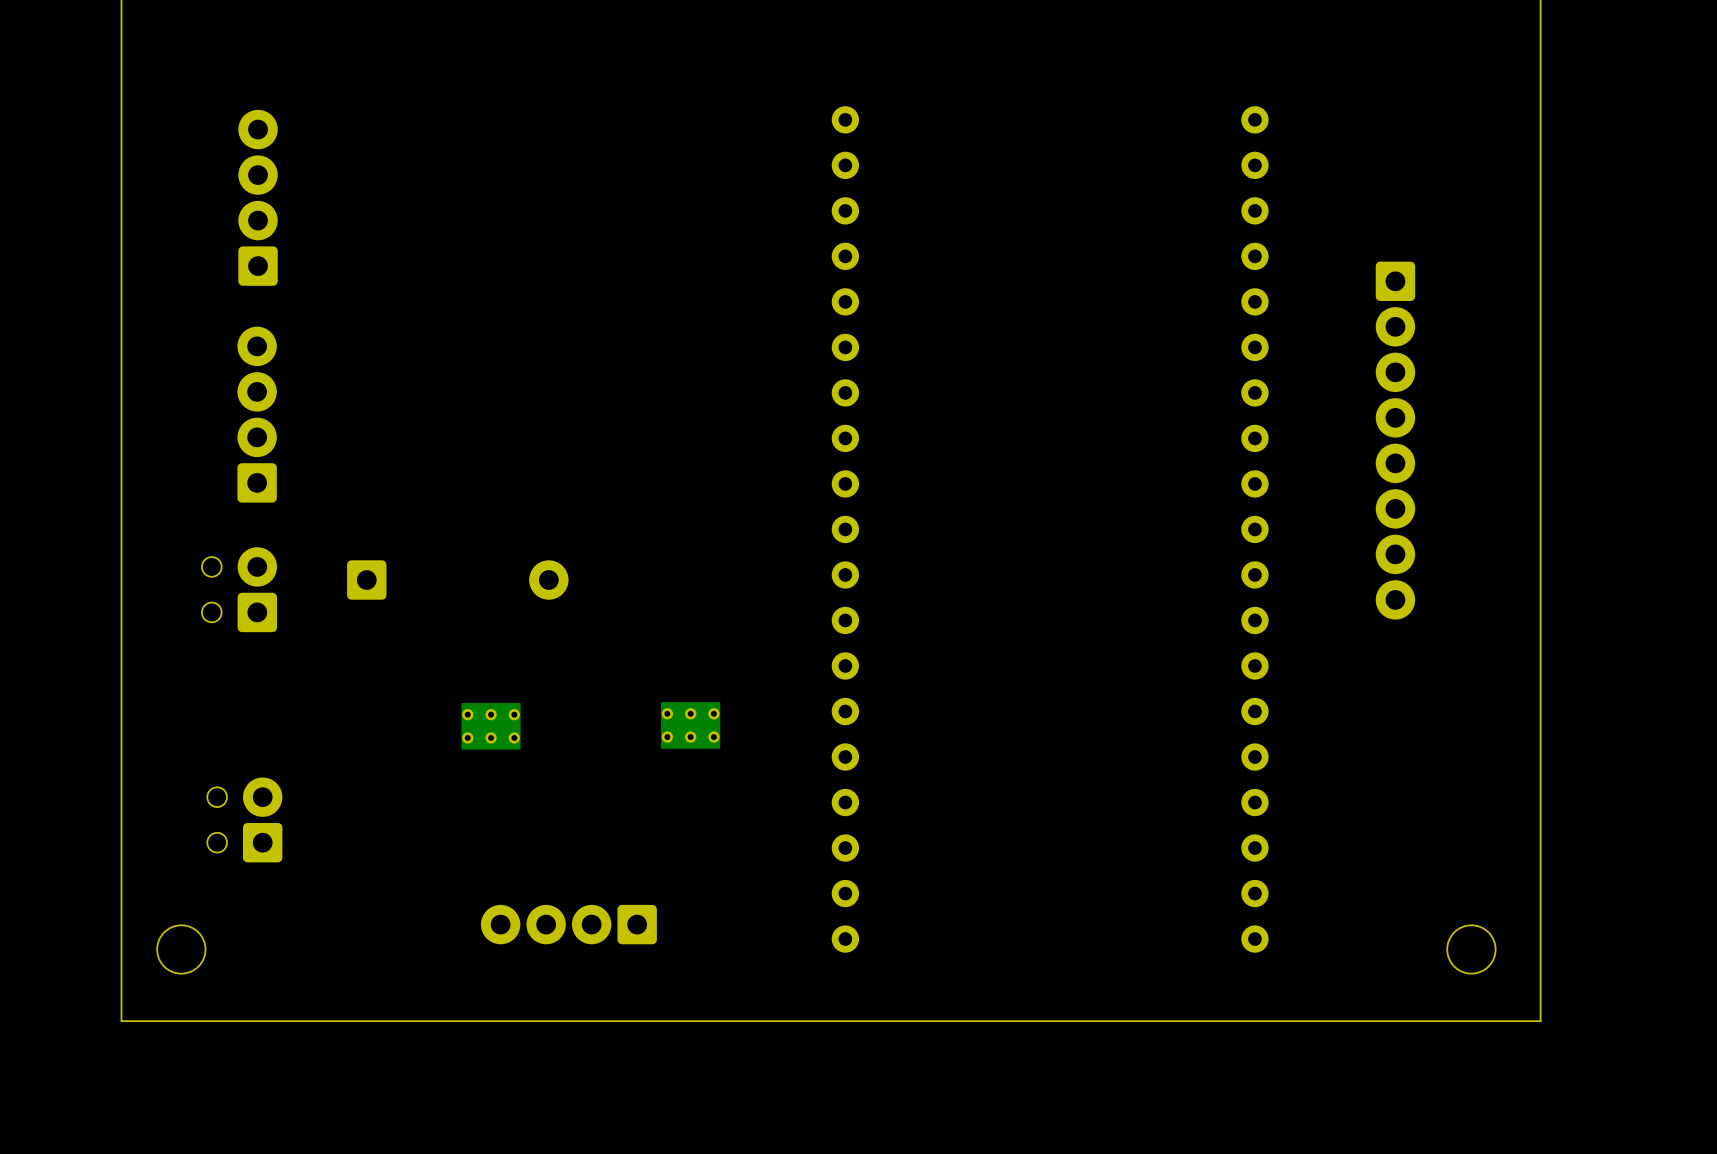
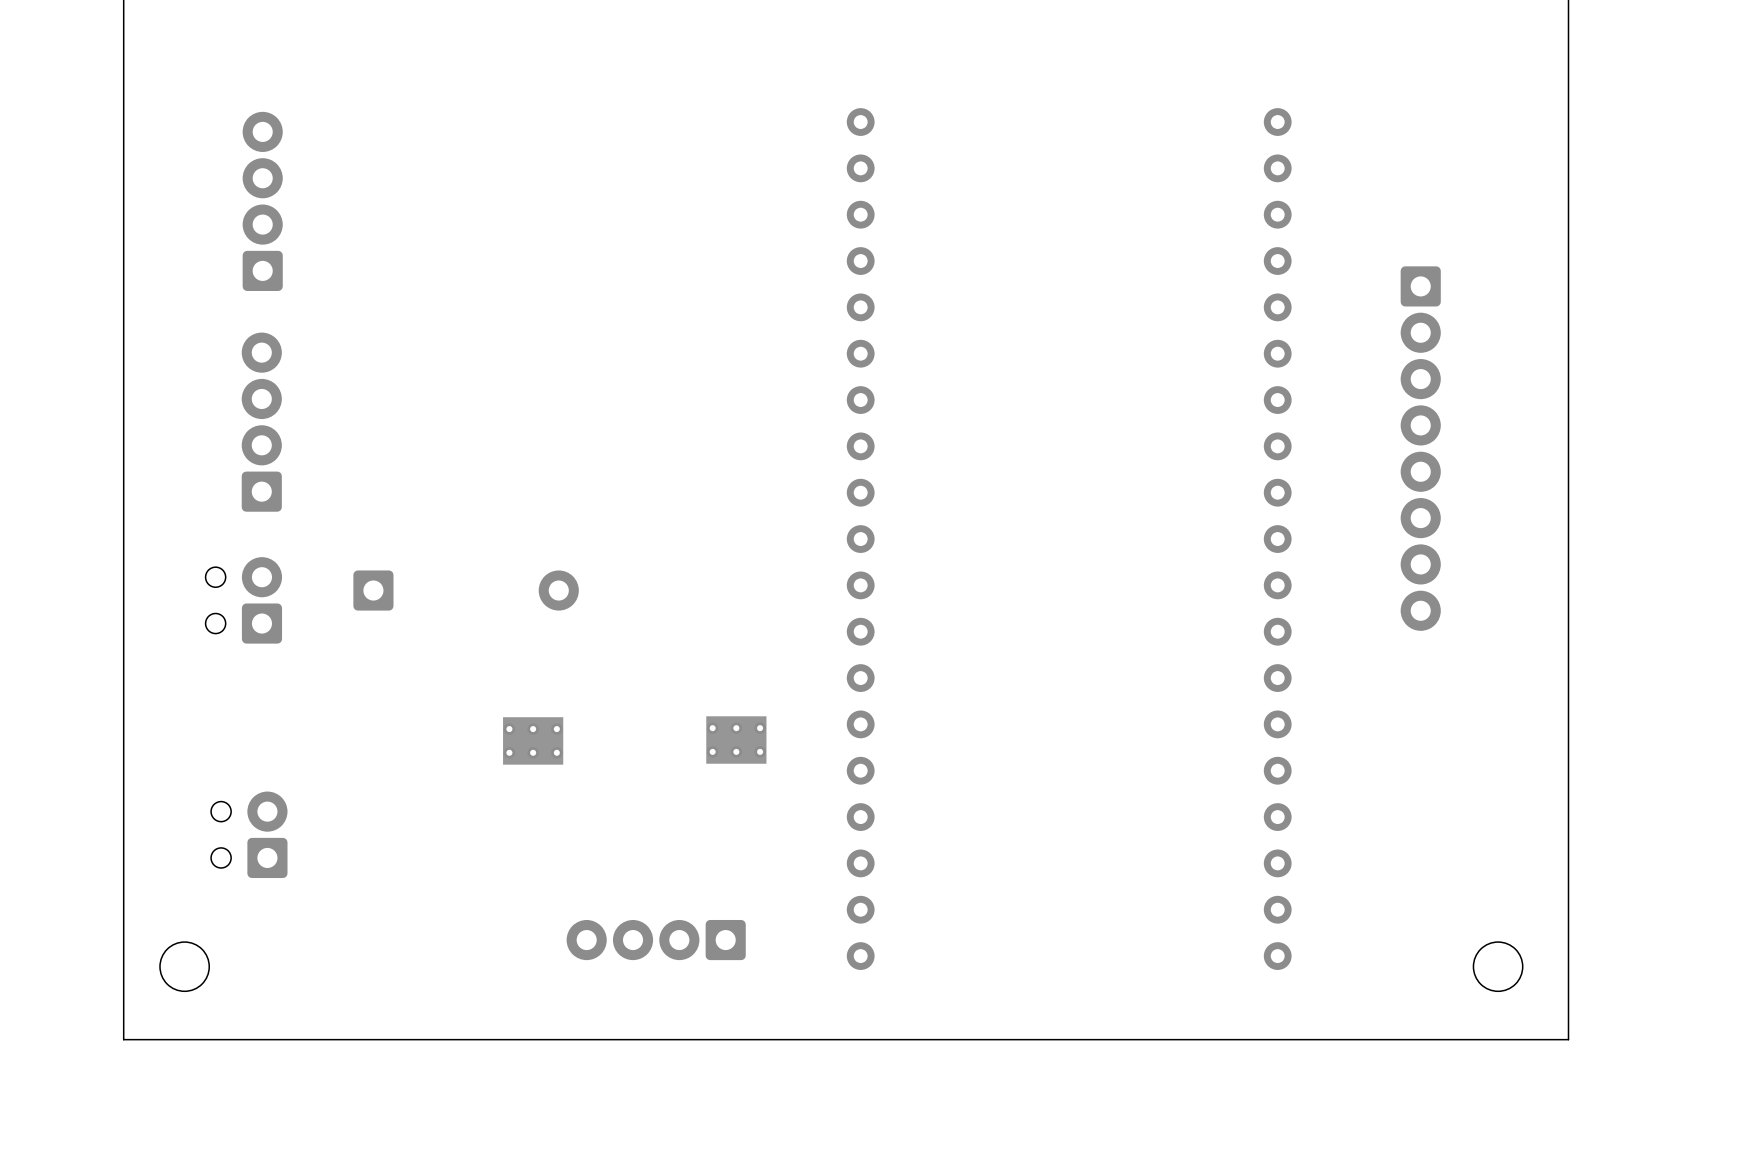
part position: (690, 725) -> (736, 740)
part position: (491, 726) -> (533, 740)
part position: (568, 924) -> (656, 940)

